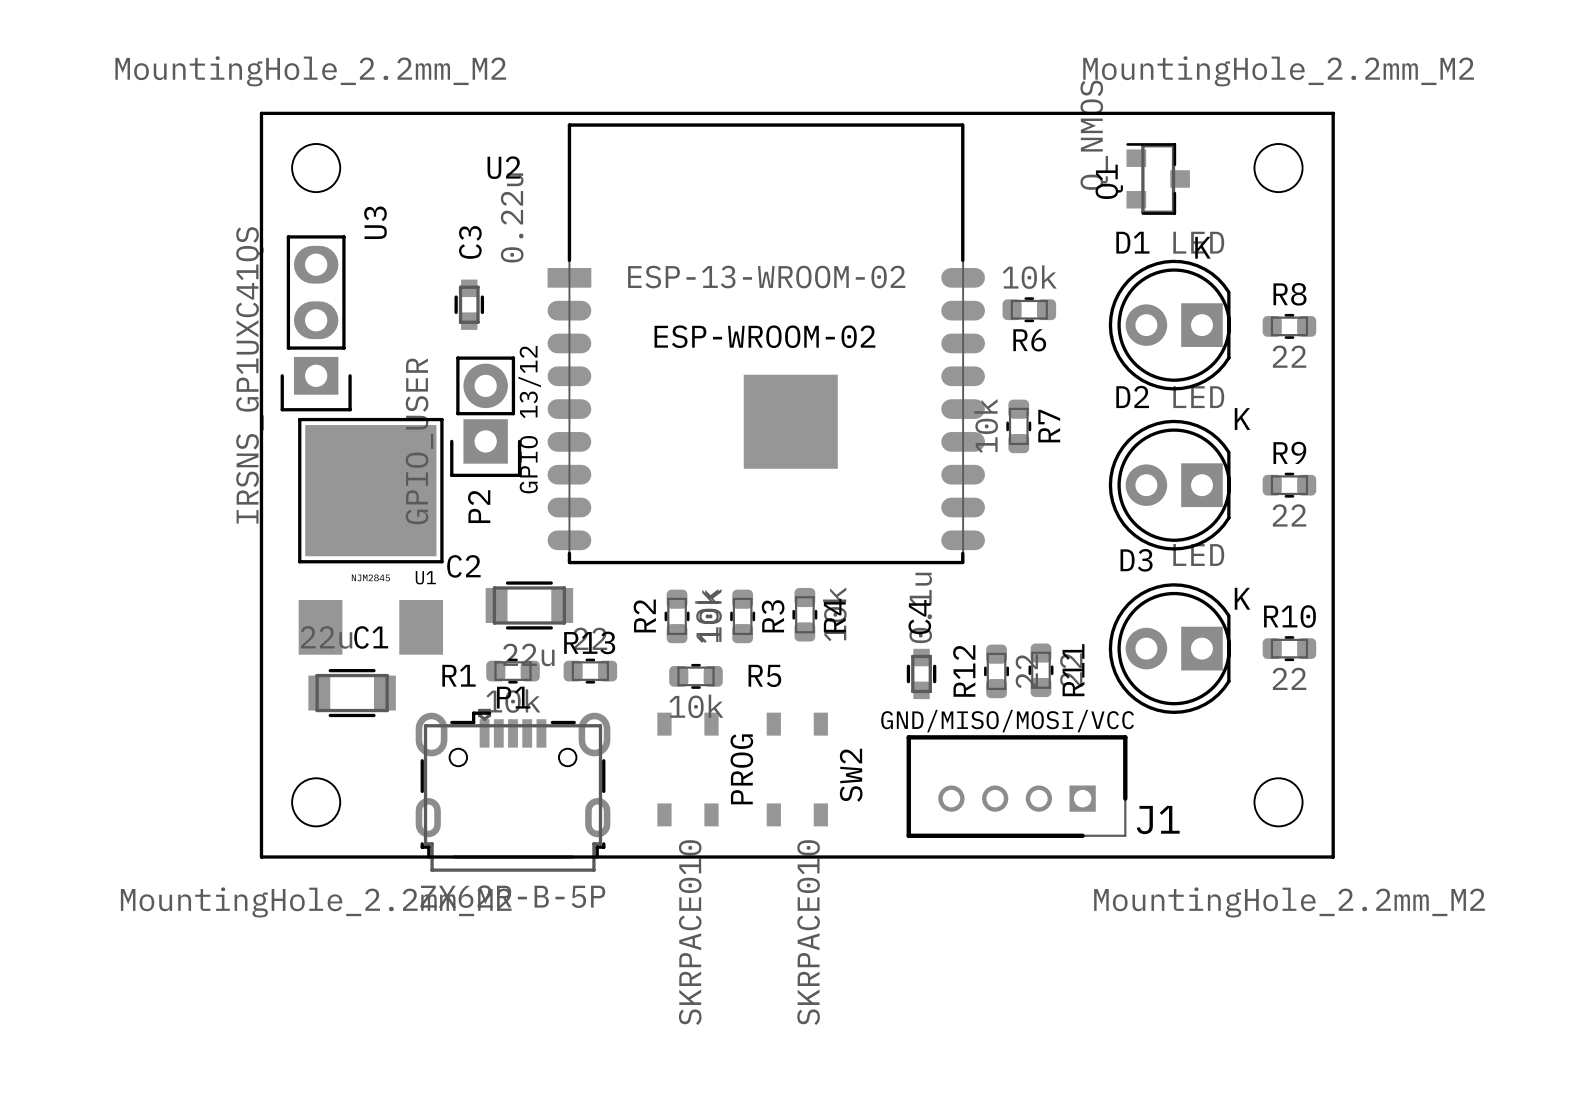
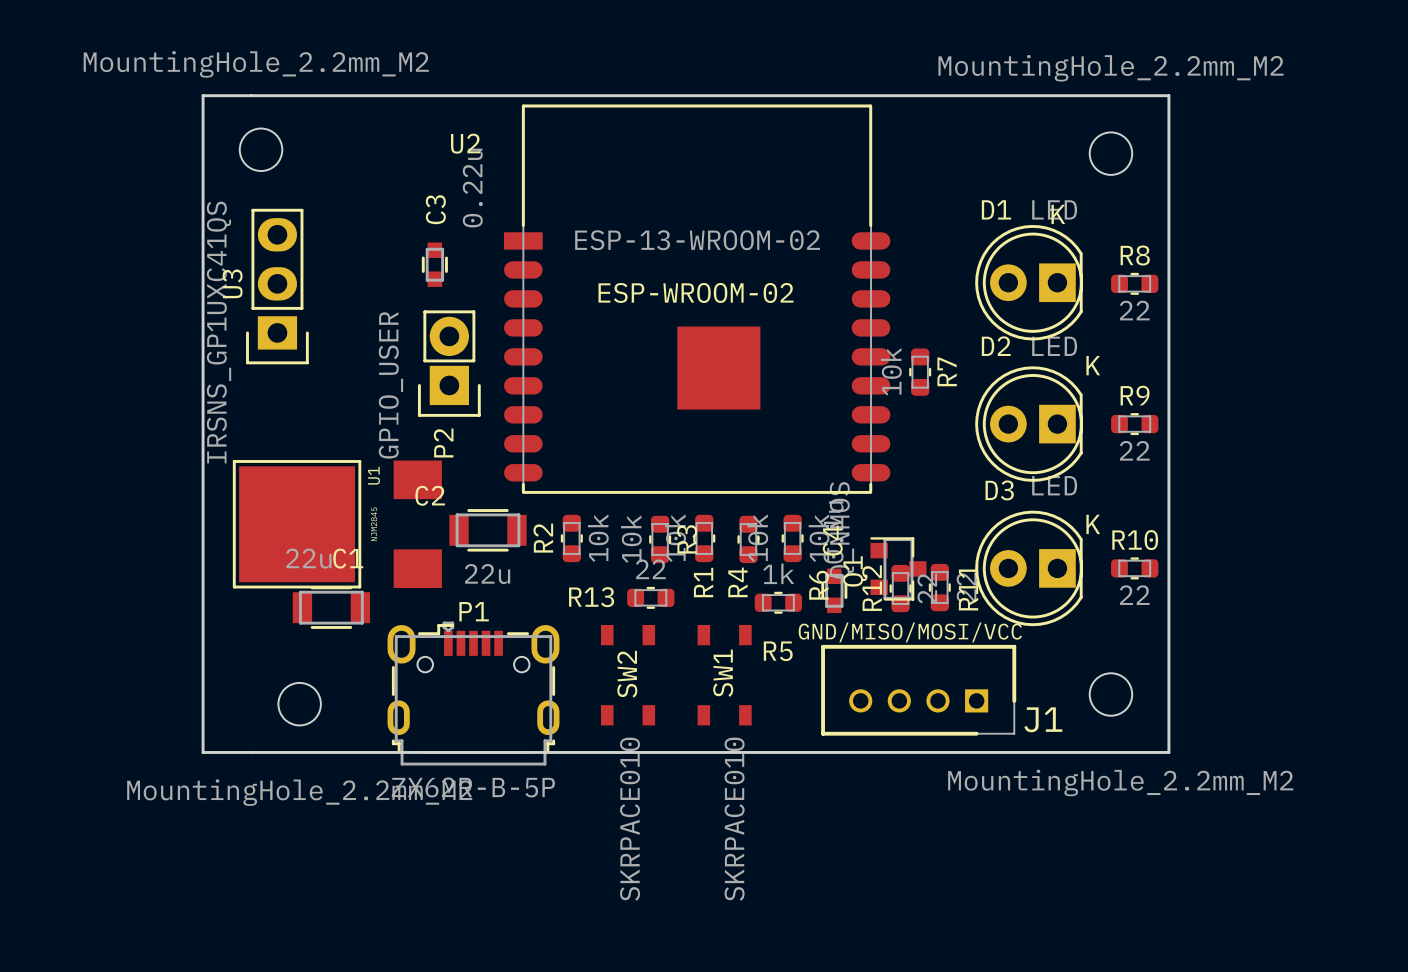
board edge: (261, 113) (261, 857) -> (251, 95) (203, 95) (203, 752) (251, 752)
board edge: (1300, 113) (1333, 113) (1333, 857) (1300, 857) -> (1168, 95) (1168, 752)
part position: (316, 168) -> (261, 149)
part position: (1278, 168) -> (1110, 153)
Q1 position: (1158, 178) -> (898, 568)
U3 name position: U3 (375, 222) -> U3 (232, 283)
R6 rotation: 0° (1029, 309) -> 90° clockwise (792, 538)
R6 position: (1029, 309) -> (792, 538)
U3 position: (316, 323) -> (277, 286)
D1 position: (1169, 325) -> (1029, 282)
R8 position: (1289, 326) -> (1134, 283)
text: GPIO 13/12 (529, 419) -> none
D2 position: (1169, 485) -> (1029, 424)
R9 position: (1289, 485) -> (1134, 424)
U1 rotation: 0° (370, 536) -> 90° counterclockwise (337, 524)
R4 position: (804, 614) -> (748, 539)
R4 name position: R4 (834, 615) -> R4 (737, 582)
R2 position: (677, 616) -> (571, 538)
R3 position: (742, 616) -> (660, 539)
R13 name position: R13 (589, 642) -> R13 (591, 597)
D3 position: (1169, 648) -> (1029, 568)
R10 position: (1289, 648) -> (1134, 568)
R1 rotation: 0° (513, 671) -> 90° clockwise (704, 538)
R1 position: (513, 671) -> (704, 538)
R13 position: (590, 671) -> (650, 597)
R1 name position: R1 (459, 675) -> R1 (703, 582)
R5 name position: R5 (764, 675) -> R5 (778, 651)
R5 position: (695, 676) -> (778, 602)
R5 value: 10k (696, 706) -> 1k (778, 573)
PROG name: PROG (741, 769) -> SW2 (627, 674)
SW2 name: SW2 (851, 775) -> SW1 (723, 673)
part position: (1278, 802) -> (1110, 694)

